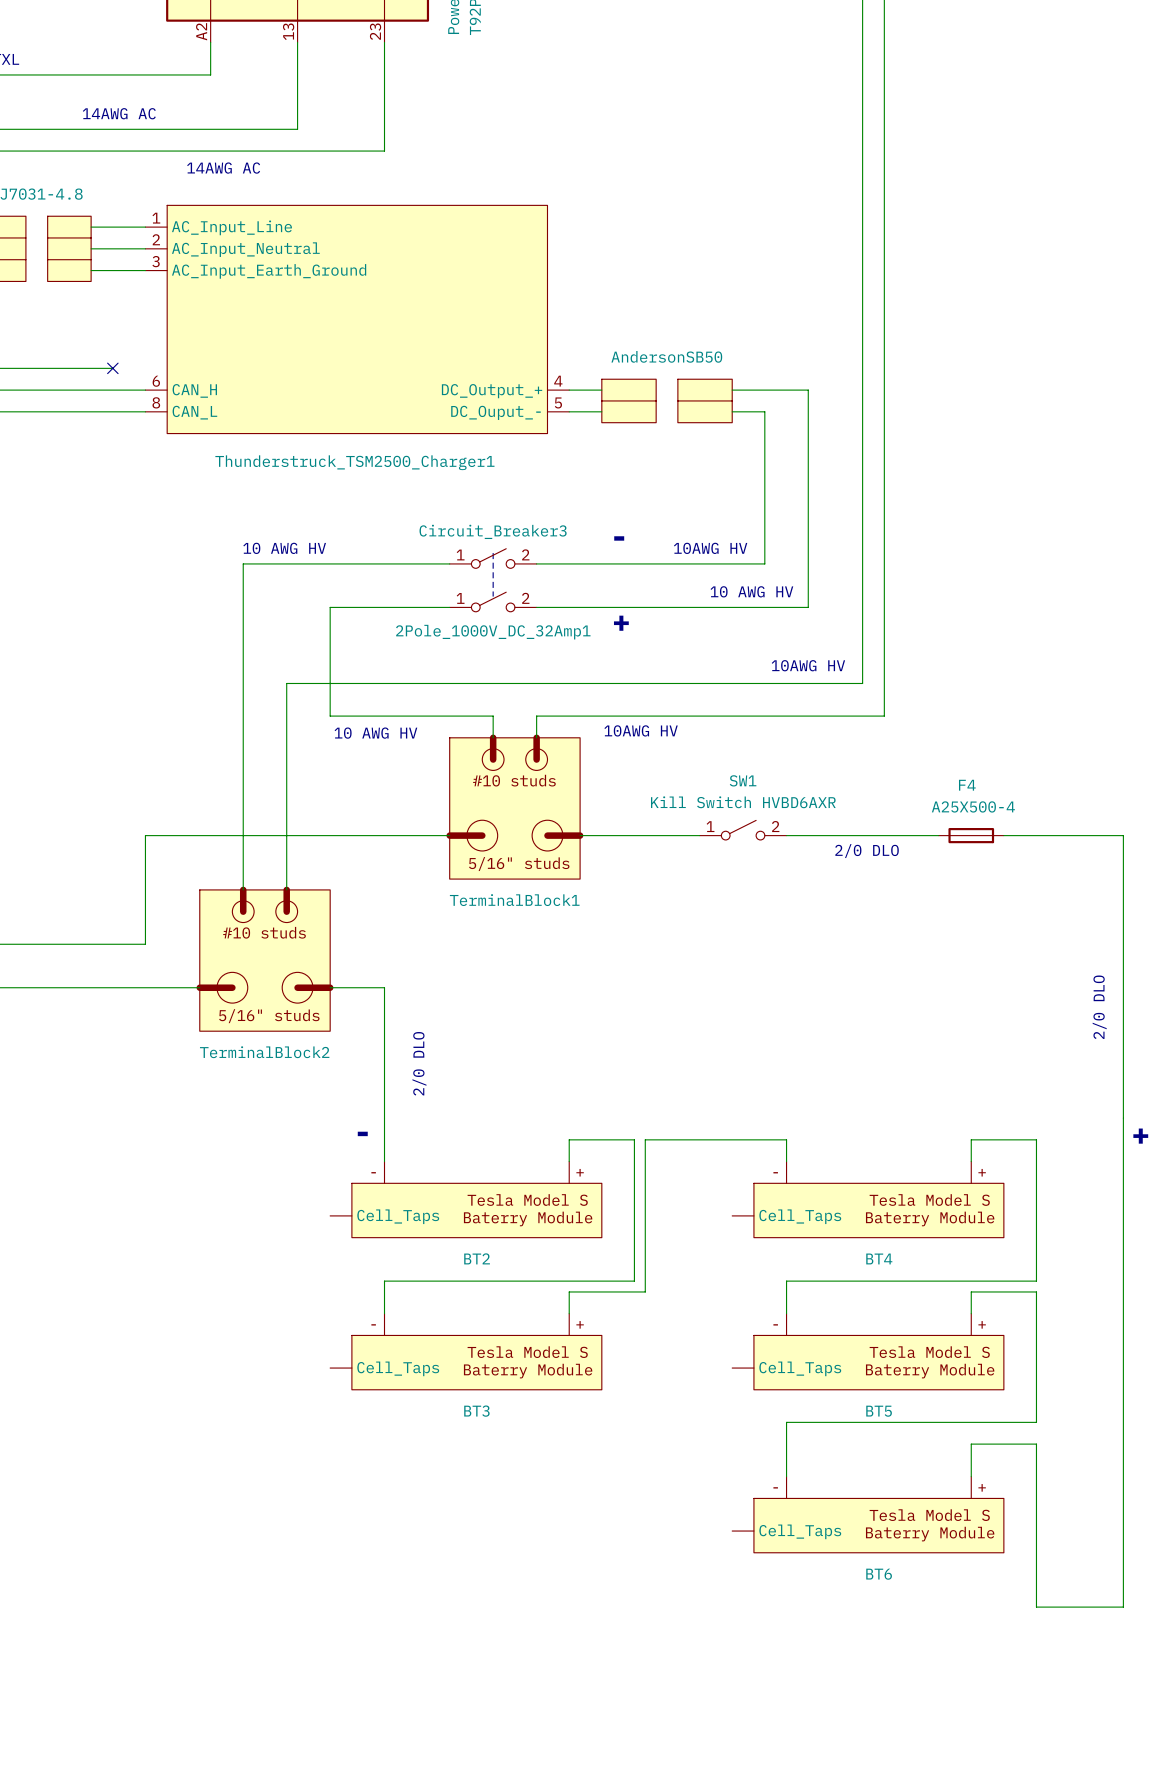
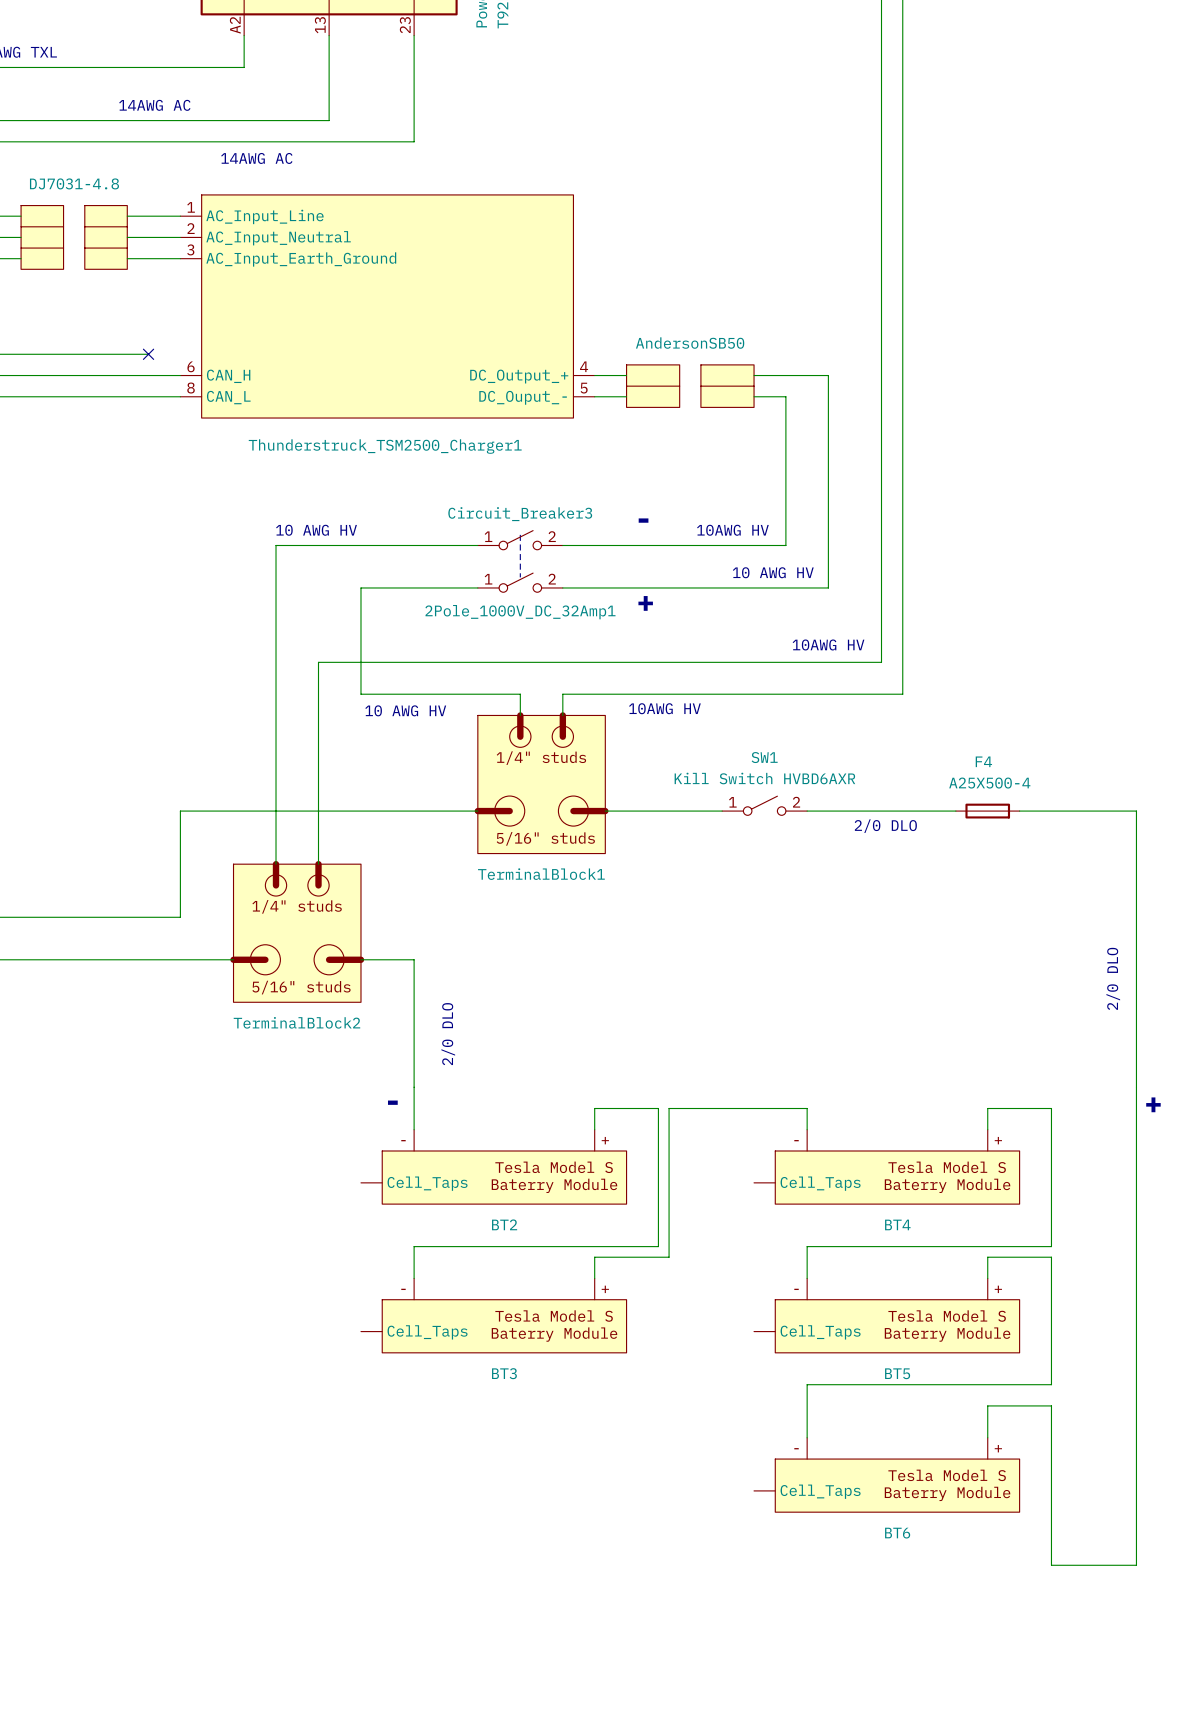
TerminalBlock1 text: #10 studs (514, 780) -> 1/4" studs (541, 758)
TerminalBlock2 text: #10 studs (264, 932) -> 1/4" studs (297, 906)

